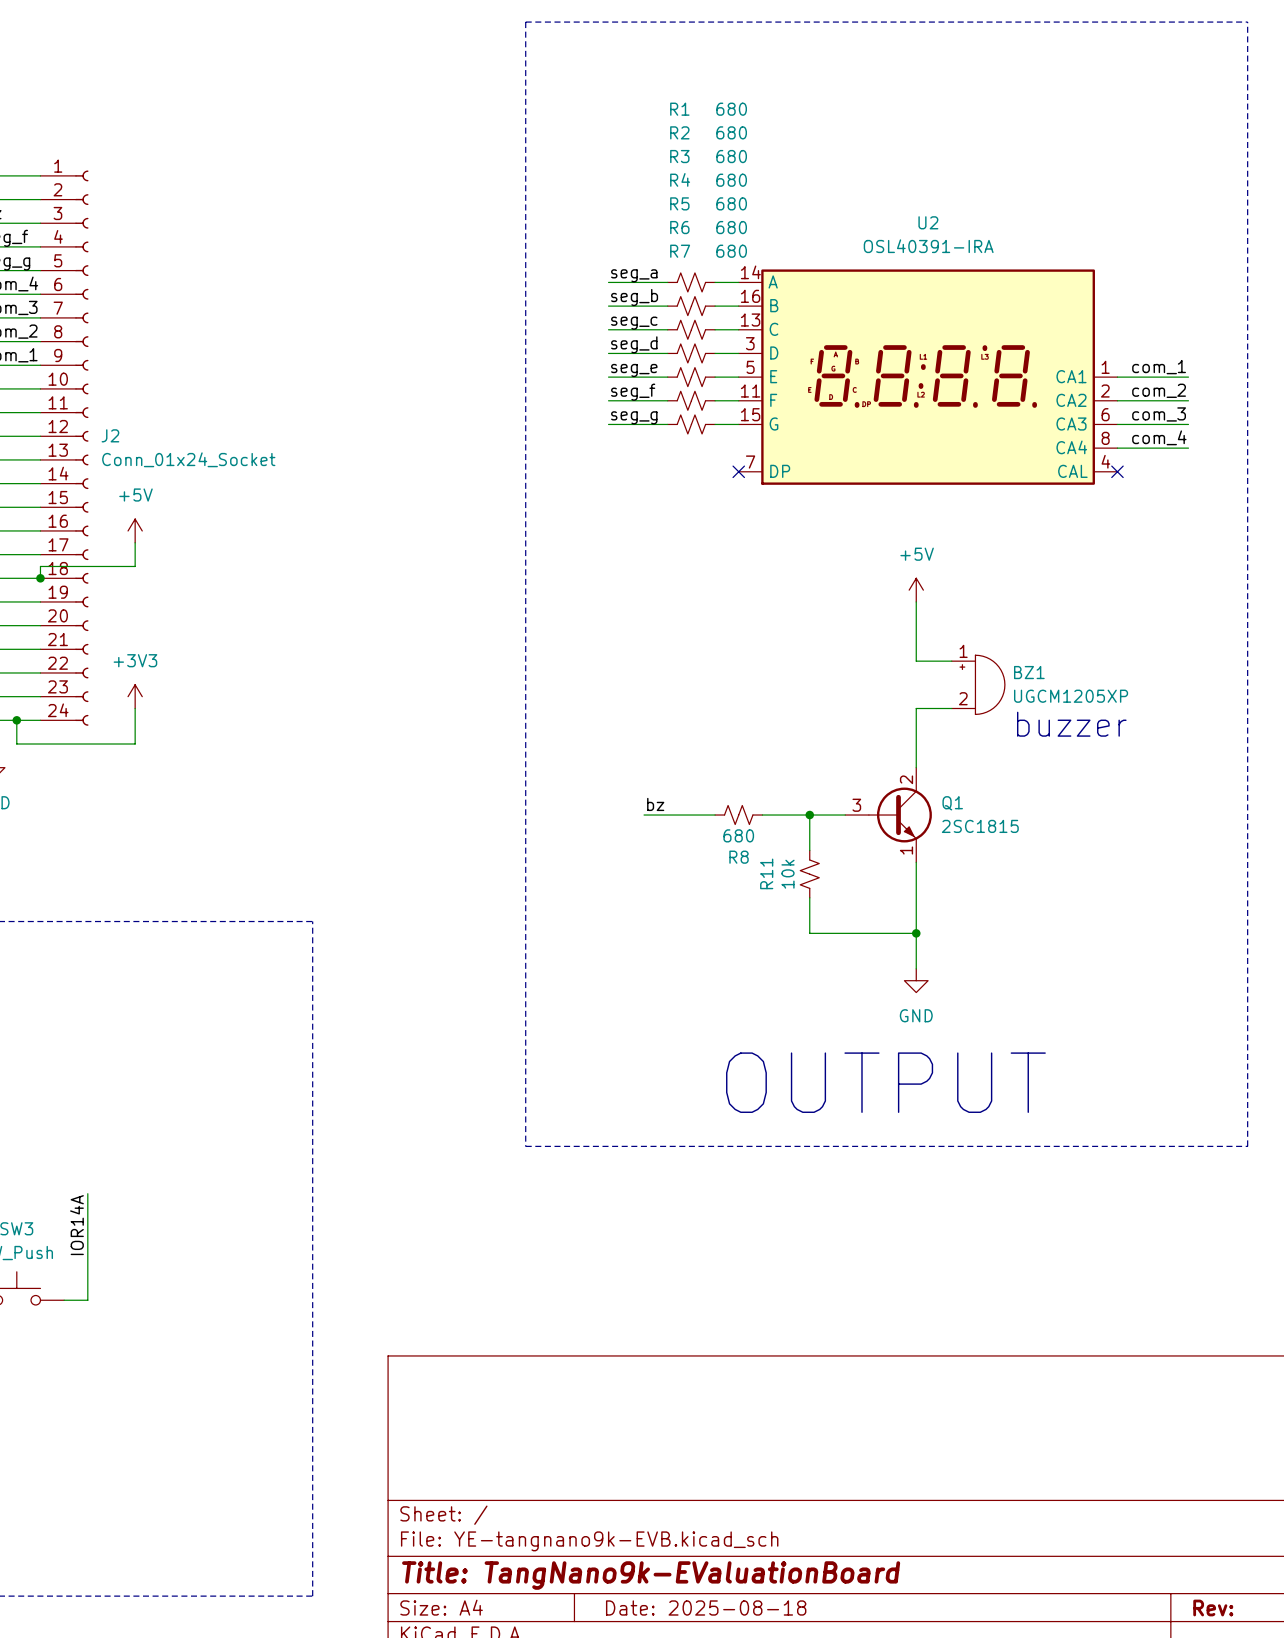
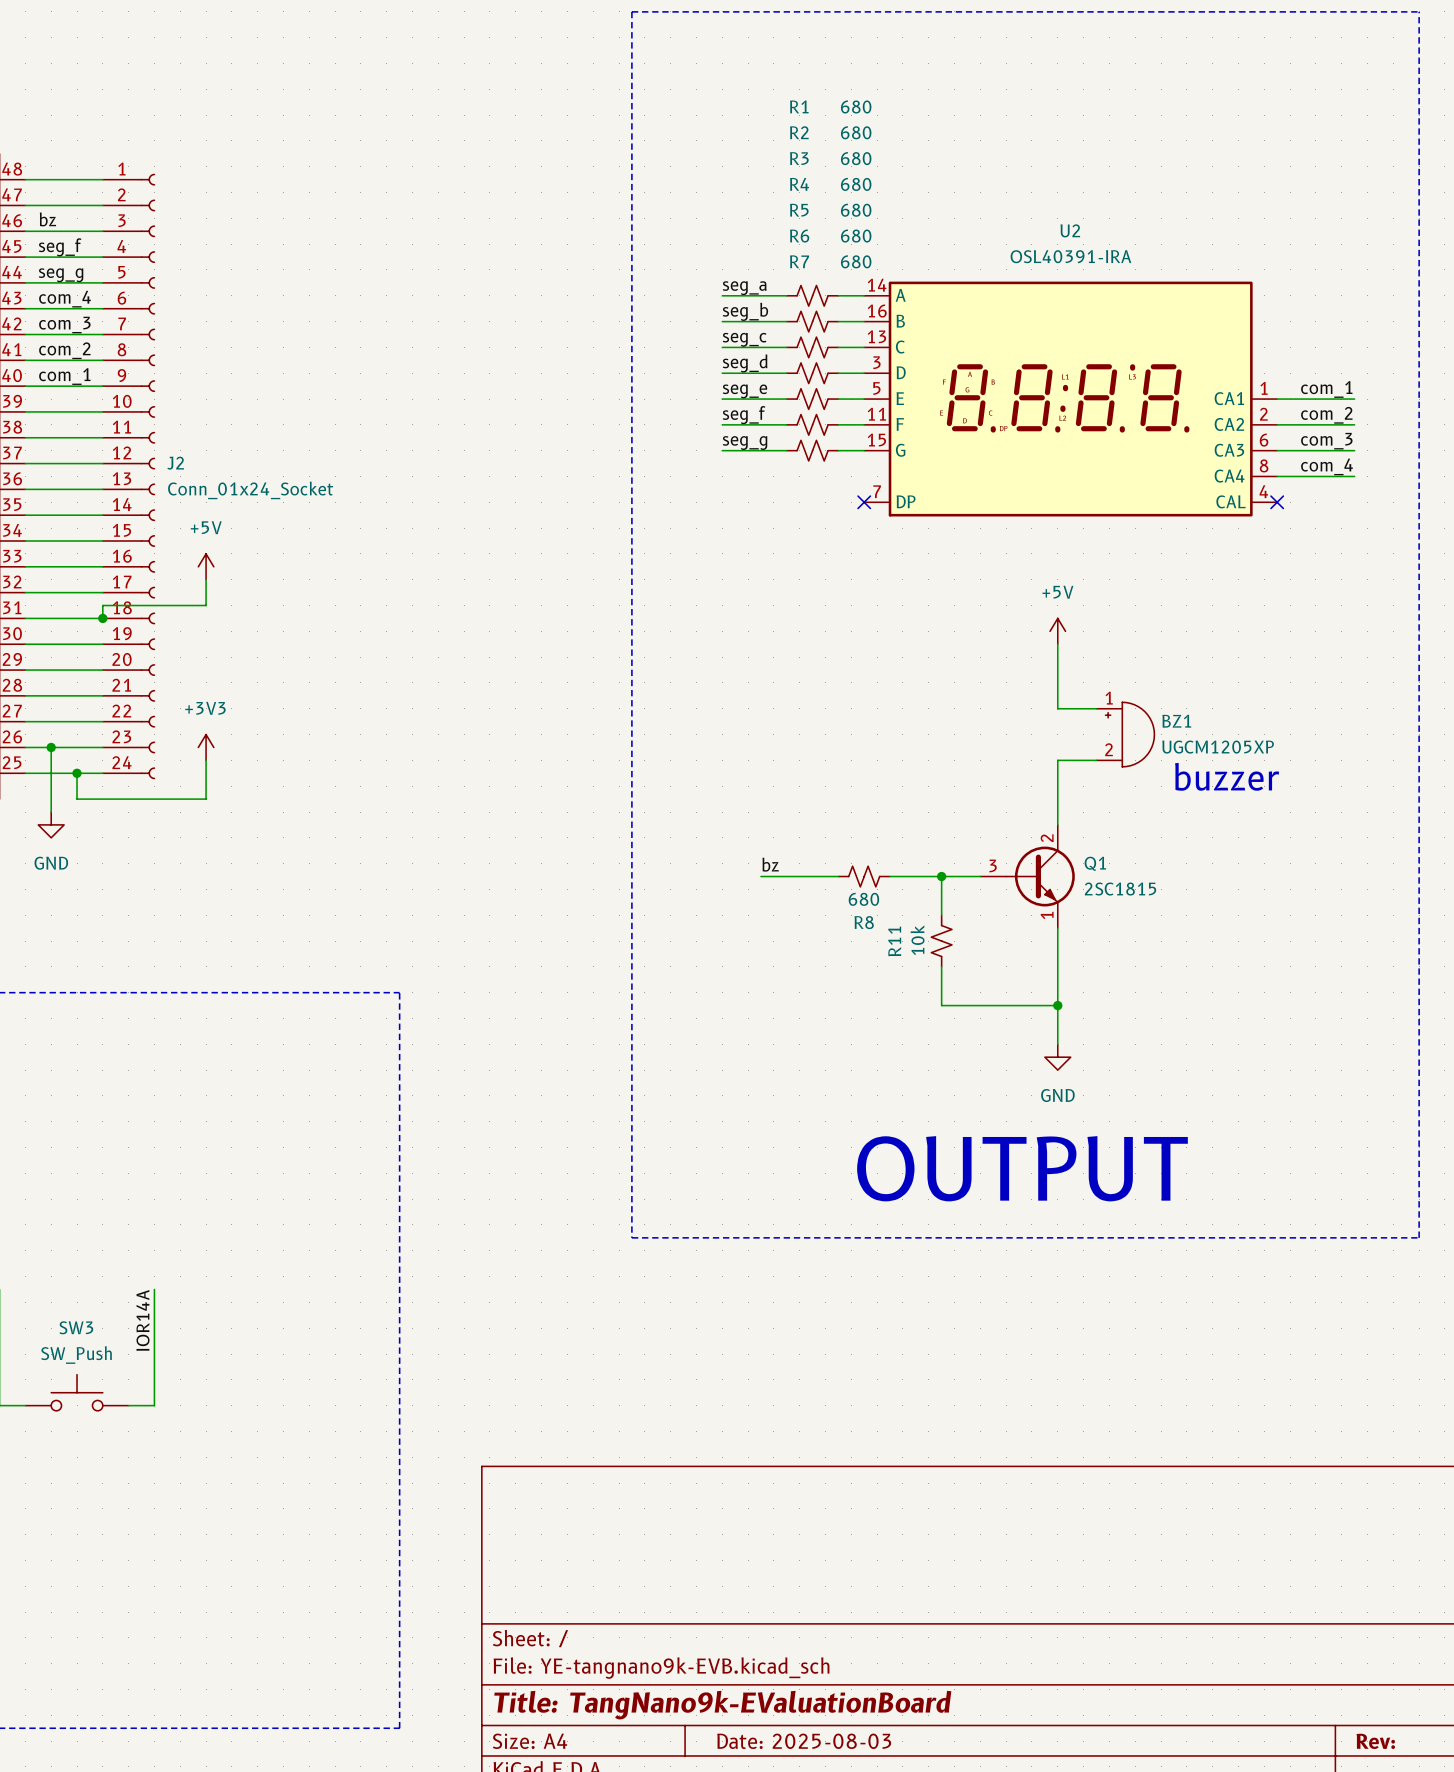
title block: Date: 2025-08-18 (706, 1607) -> Date: 2025-08-03 (804, 1741)

